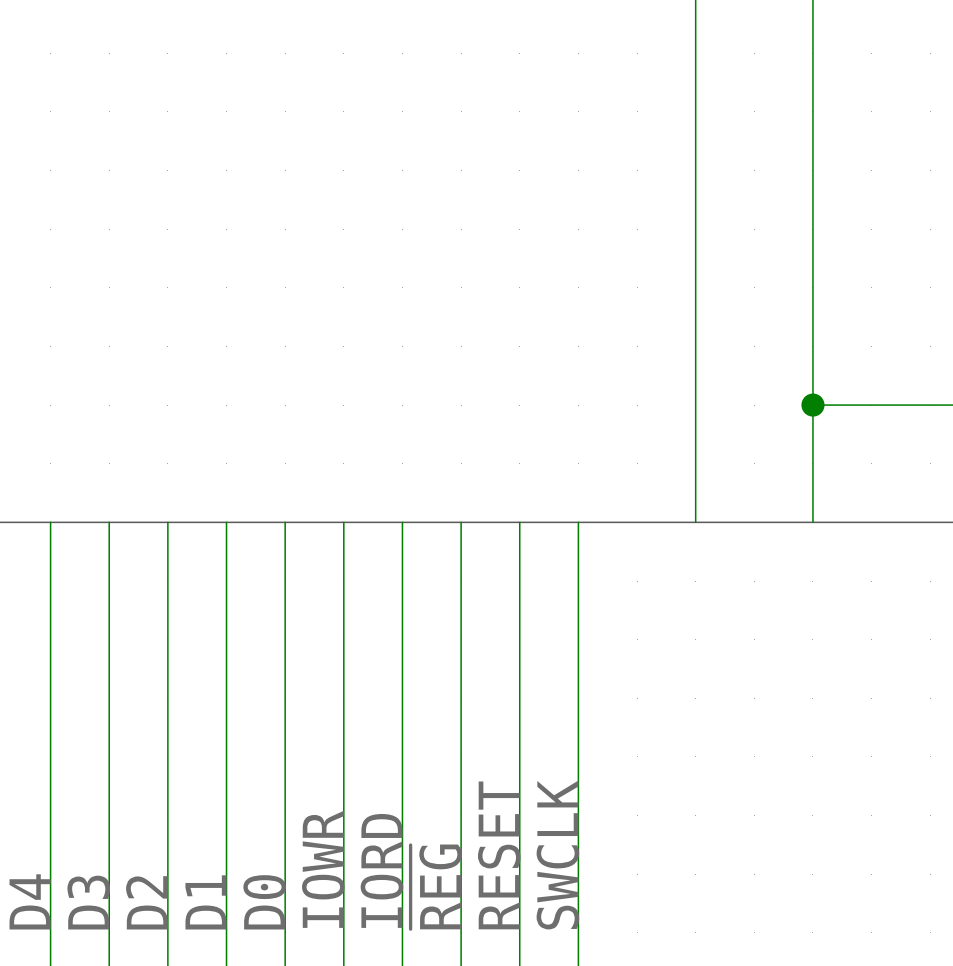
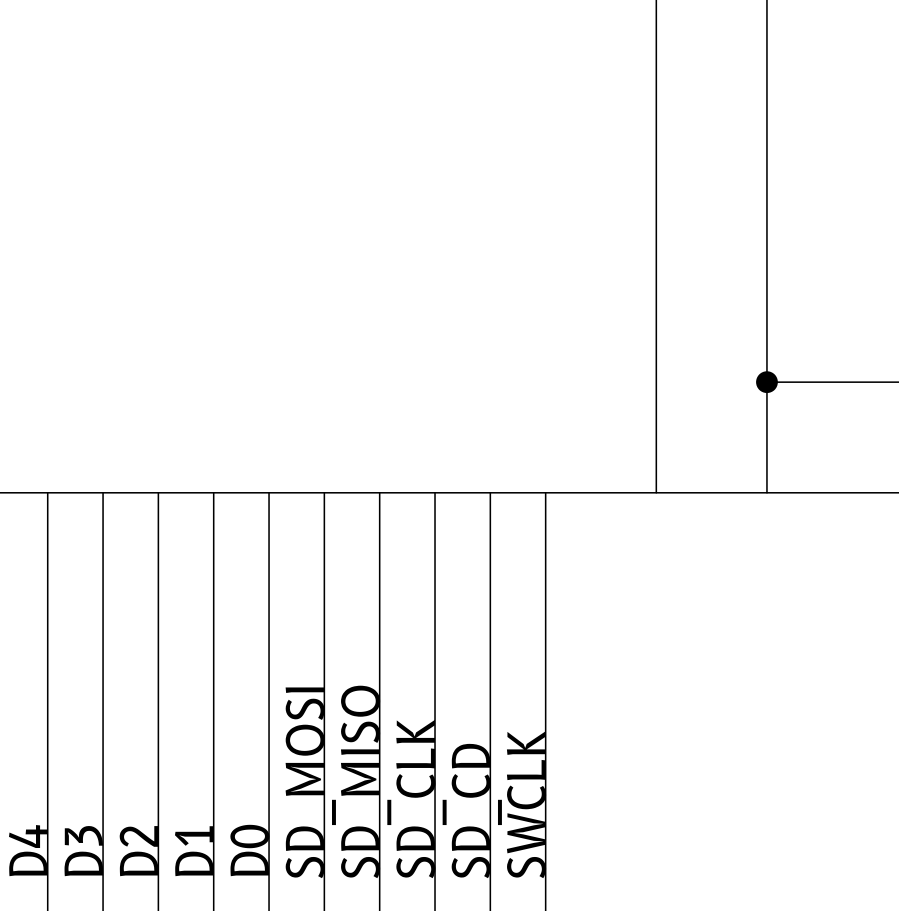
label: RESET (499, 855) -> SD_CD (476, 811)
label: IOWR (323, 869) -> SD_MOSI (310, 782)
label: IORD (381, 870) -> SD_MISO (366, 781)
label: ~{REG} (436, 886) -> SD_CLK (421, 799)

